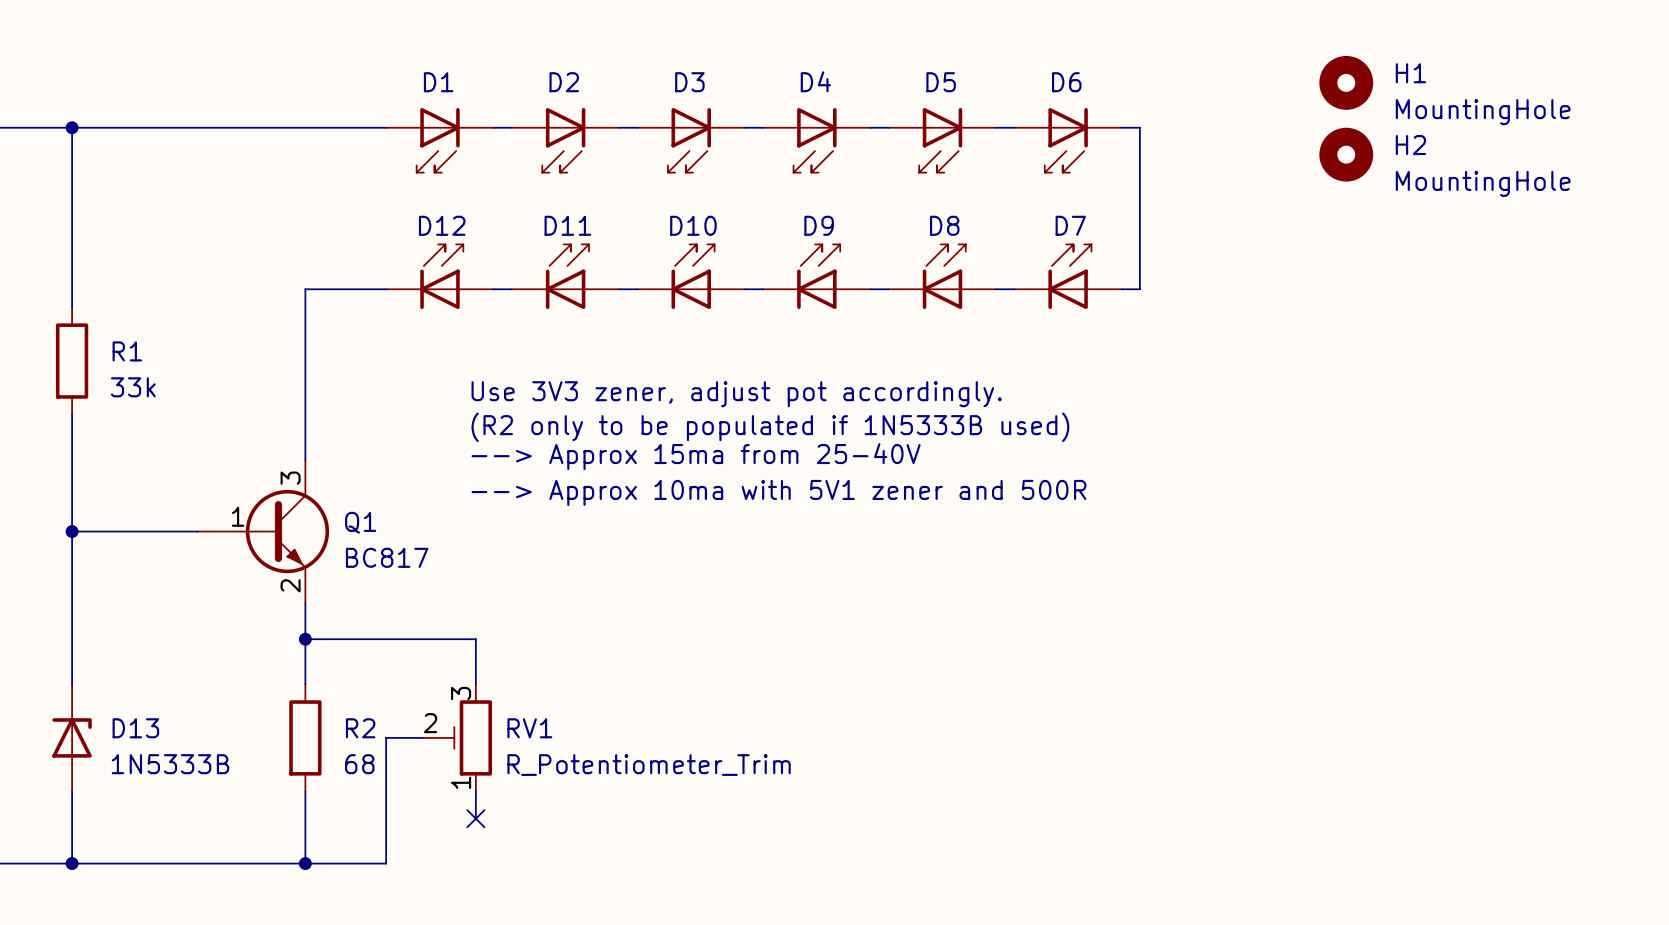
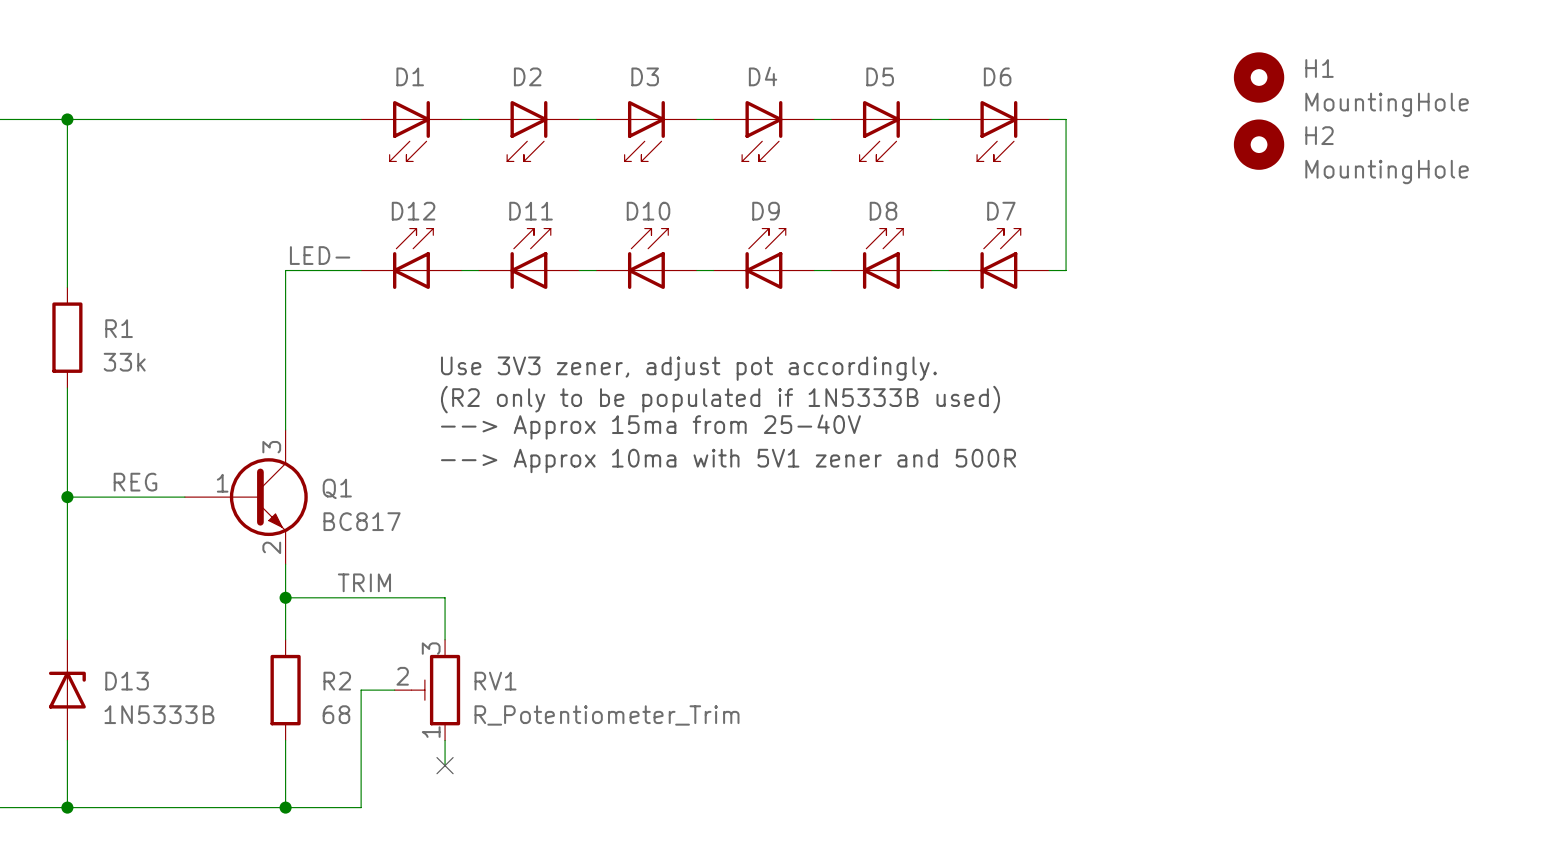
label: none -> LED- (320, 255)
label: none -> REG (135, 482)
label: none -> TRIM (364, 582)

